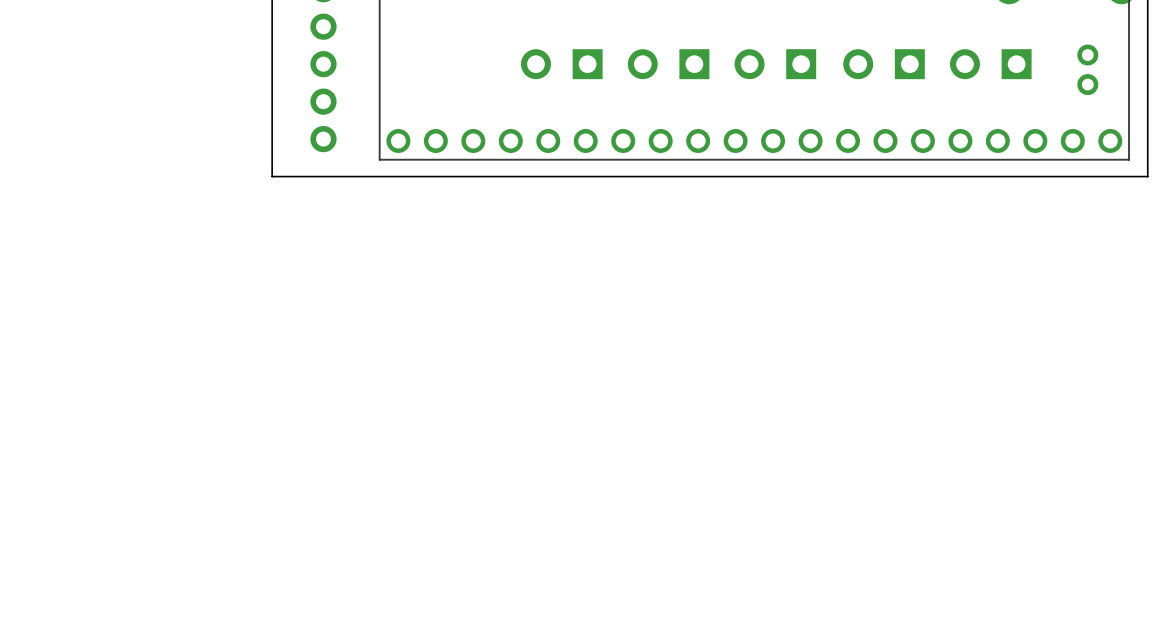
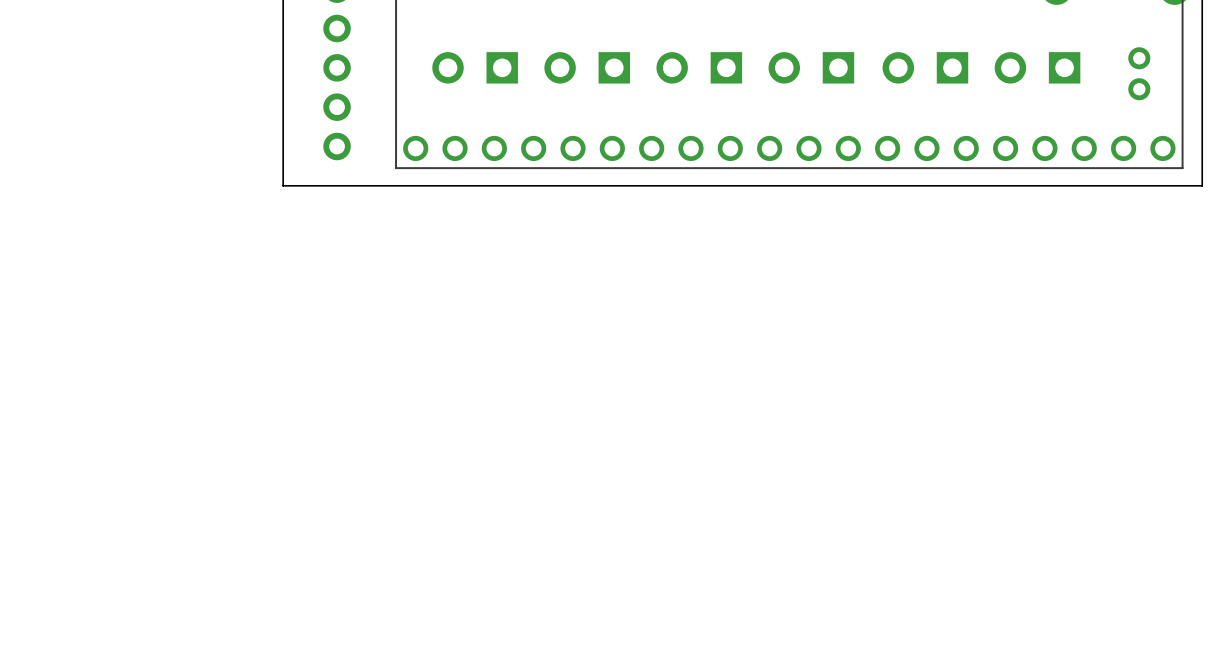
part: none -> (475, 67)

